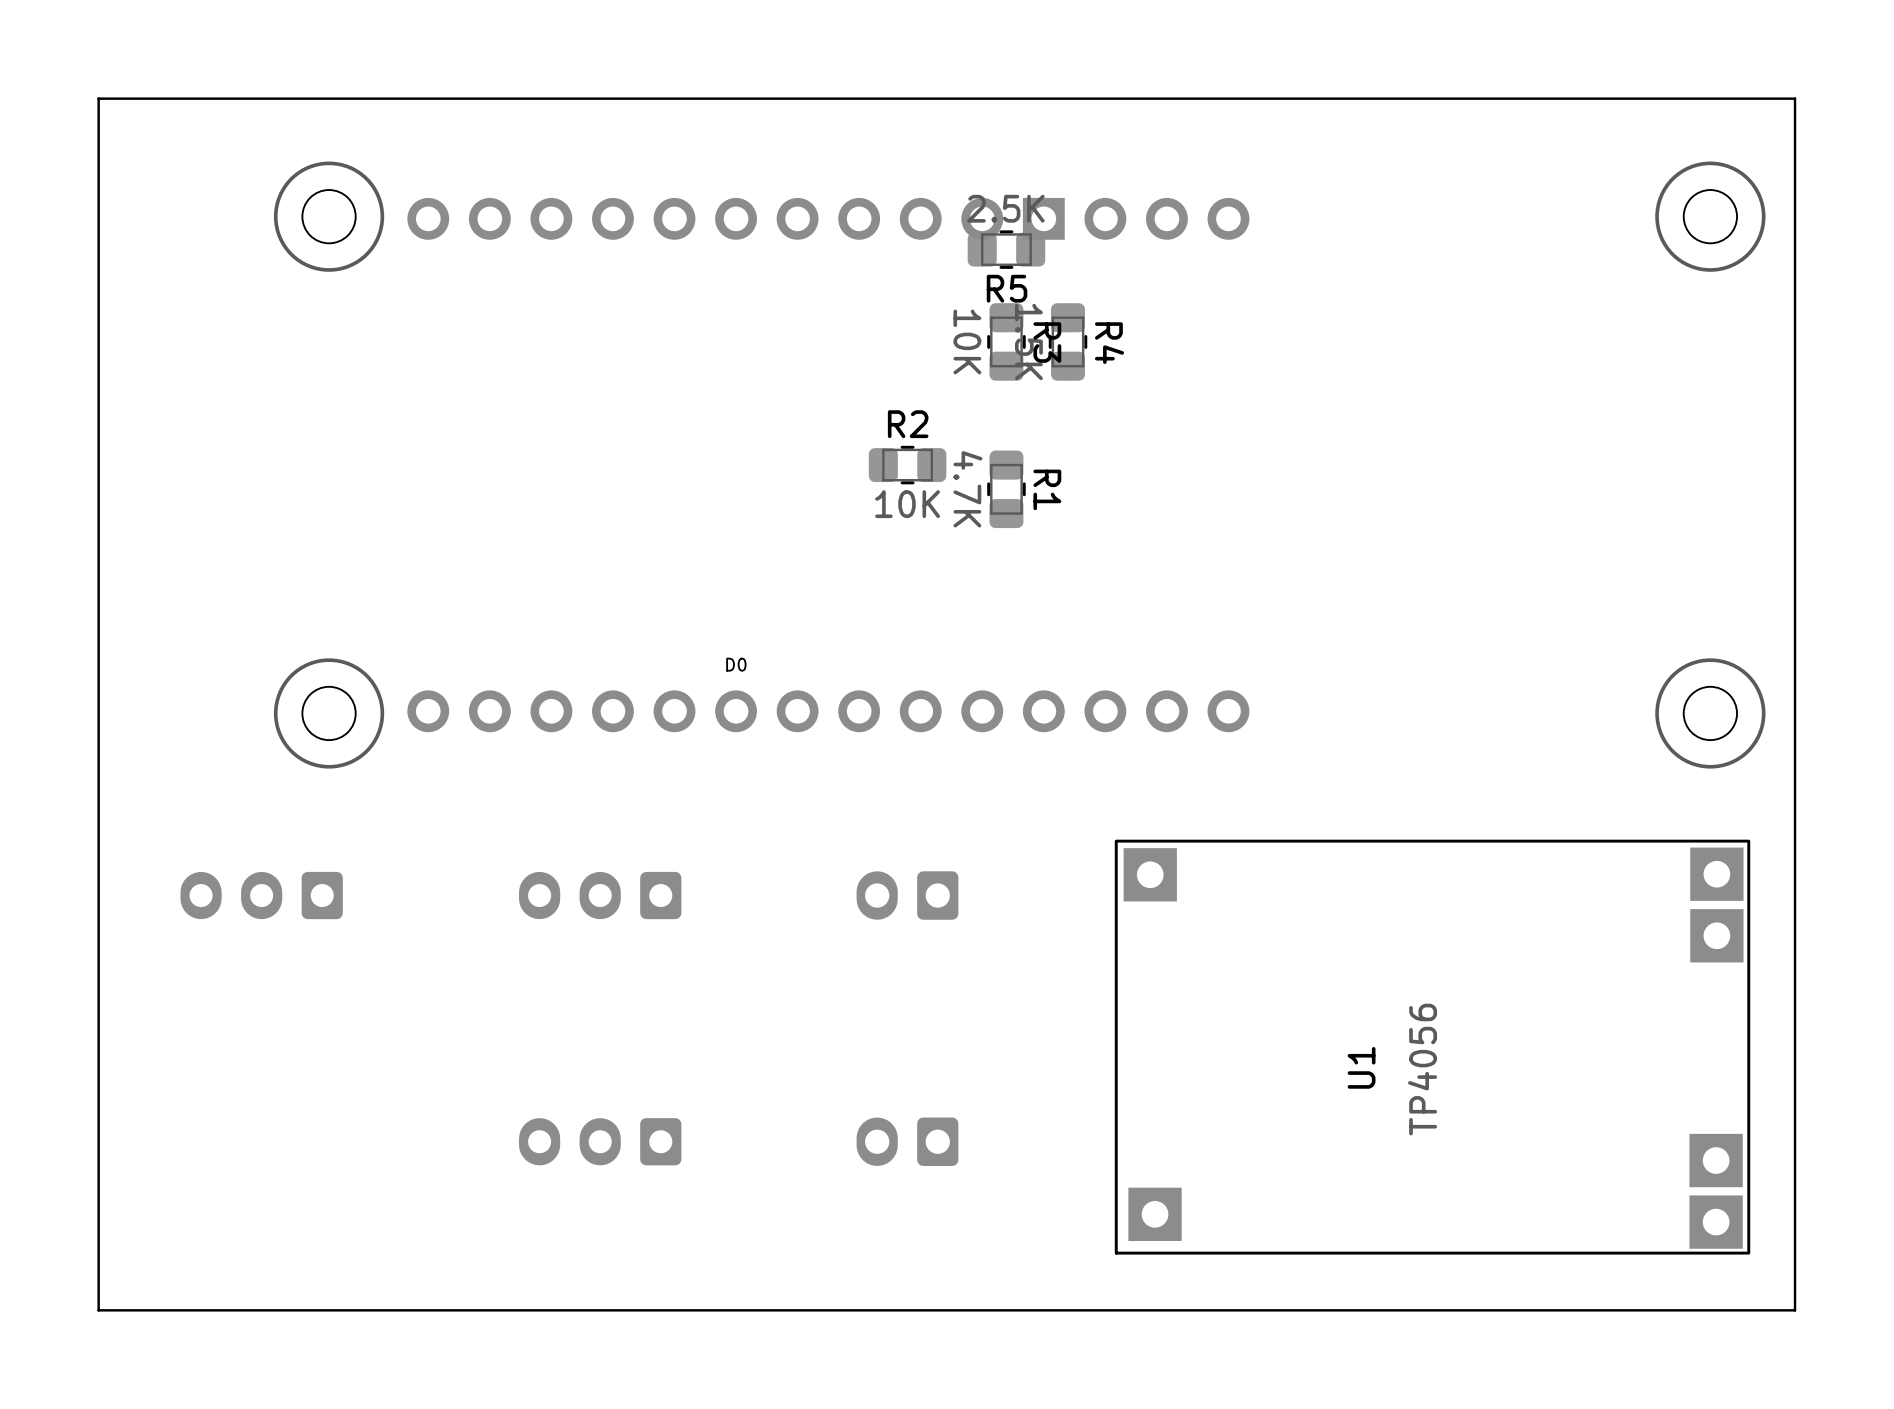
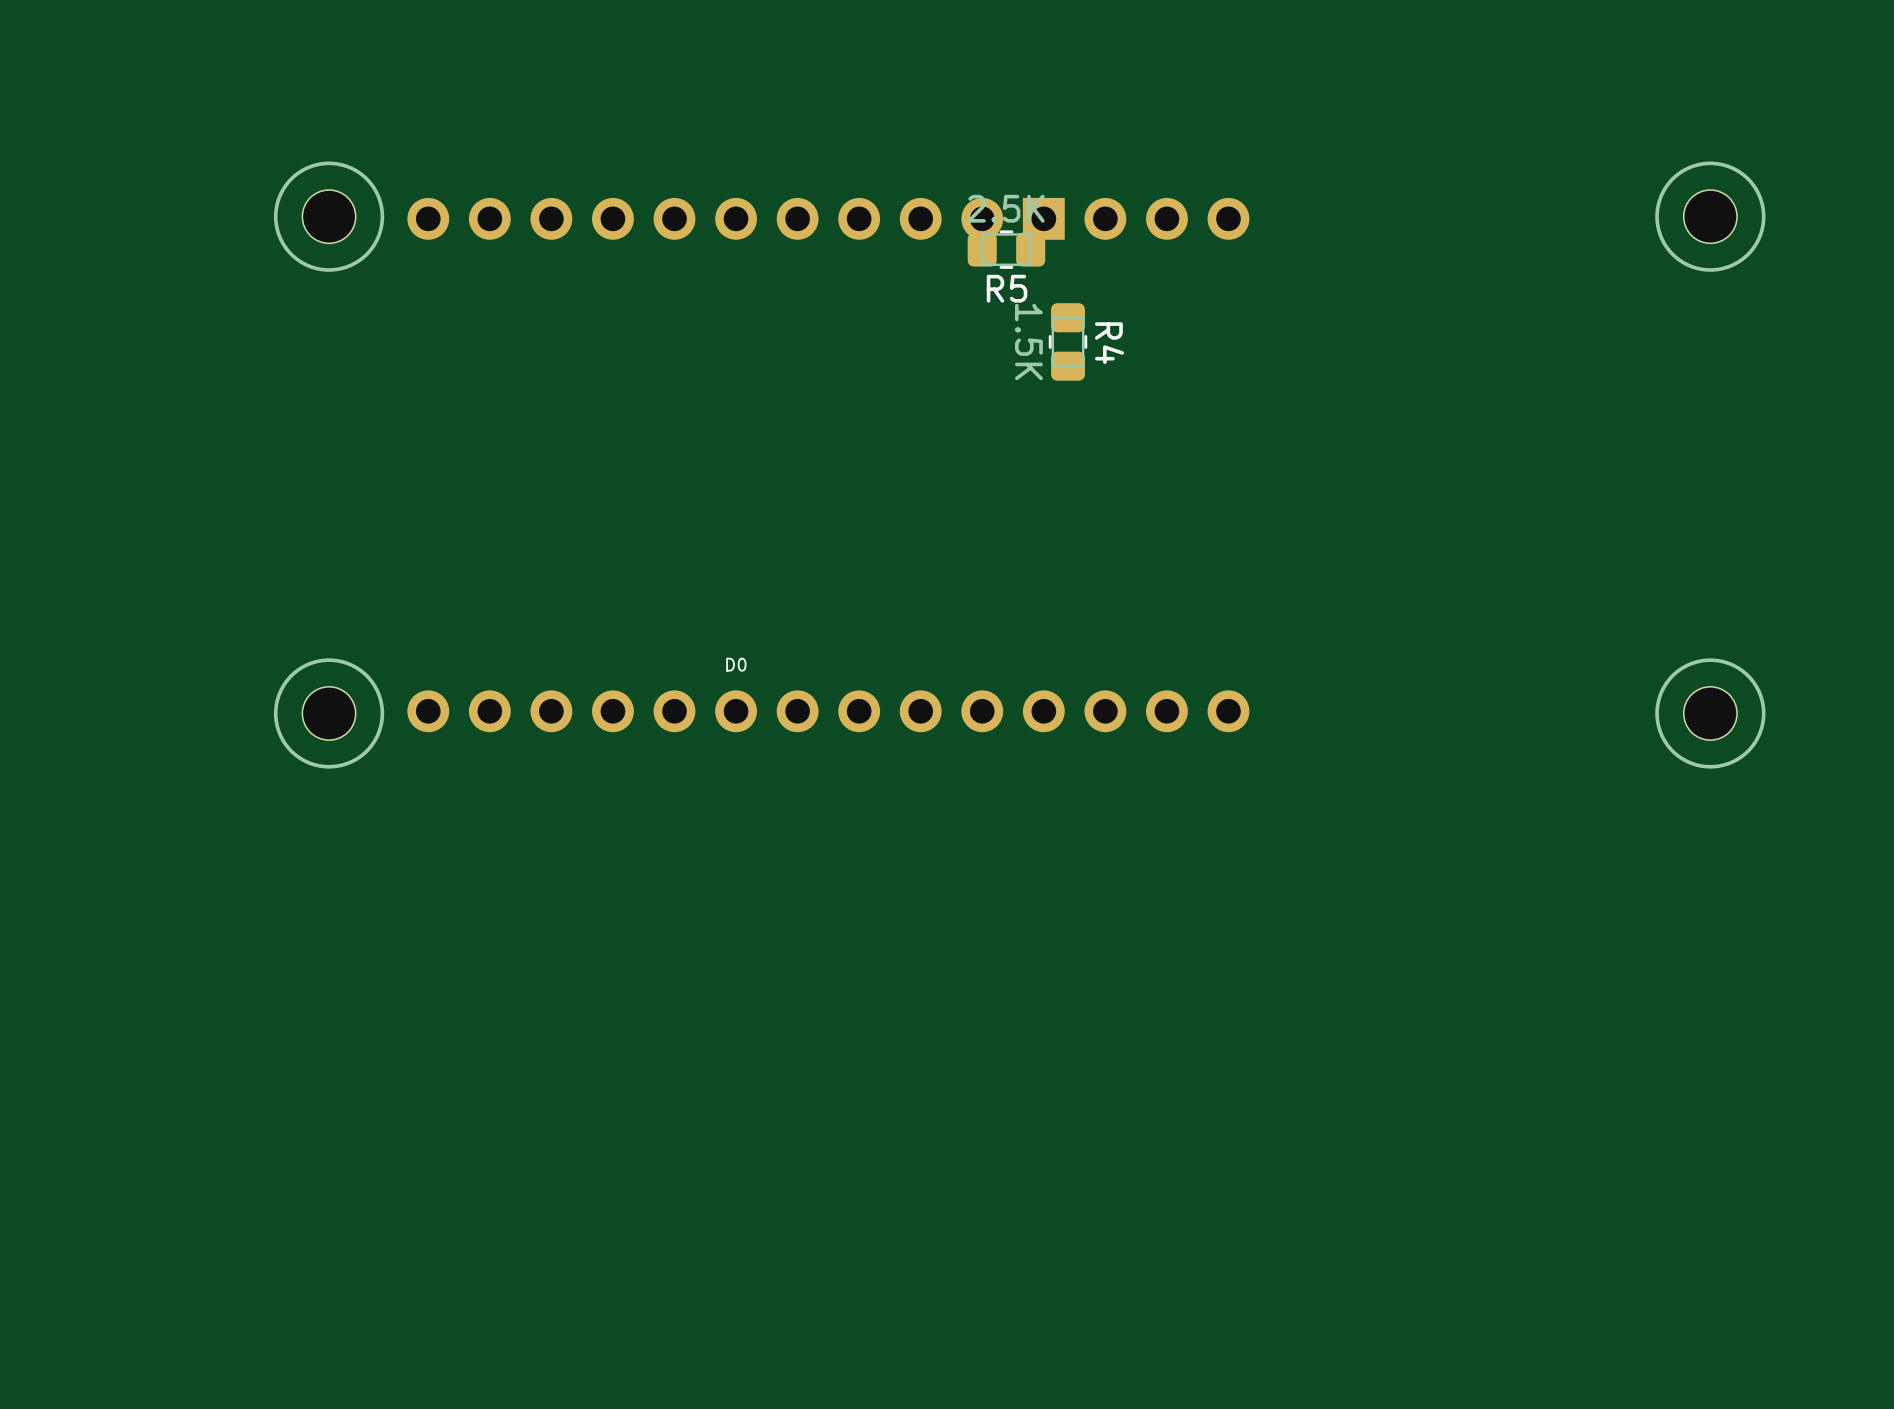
board edge: (1795, 98) (98, 98) (98, 1310) (1795, 1310) (1795, 98) -> none
R3: 10K (1006, 341) -> none
R2: 10K (907, 465) -> none
R1: 4.7K (1006, 489) -> none
part: (261, 895) -> none
part: (600, 895) -> none
part: (907, 895) -> none
U1: TP4056 (1432, 1047) -> none
part: (600, 1141) -> none
part: (907, 1141) -> none

